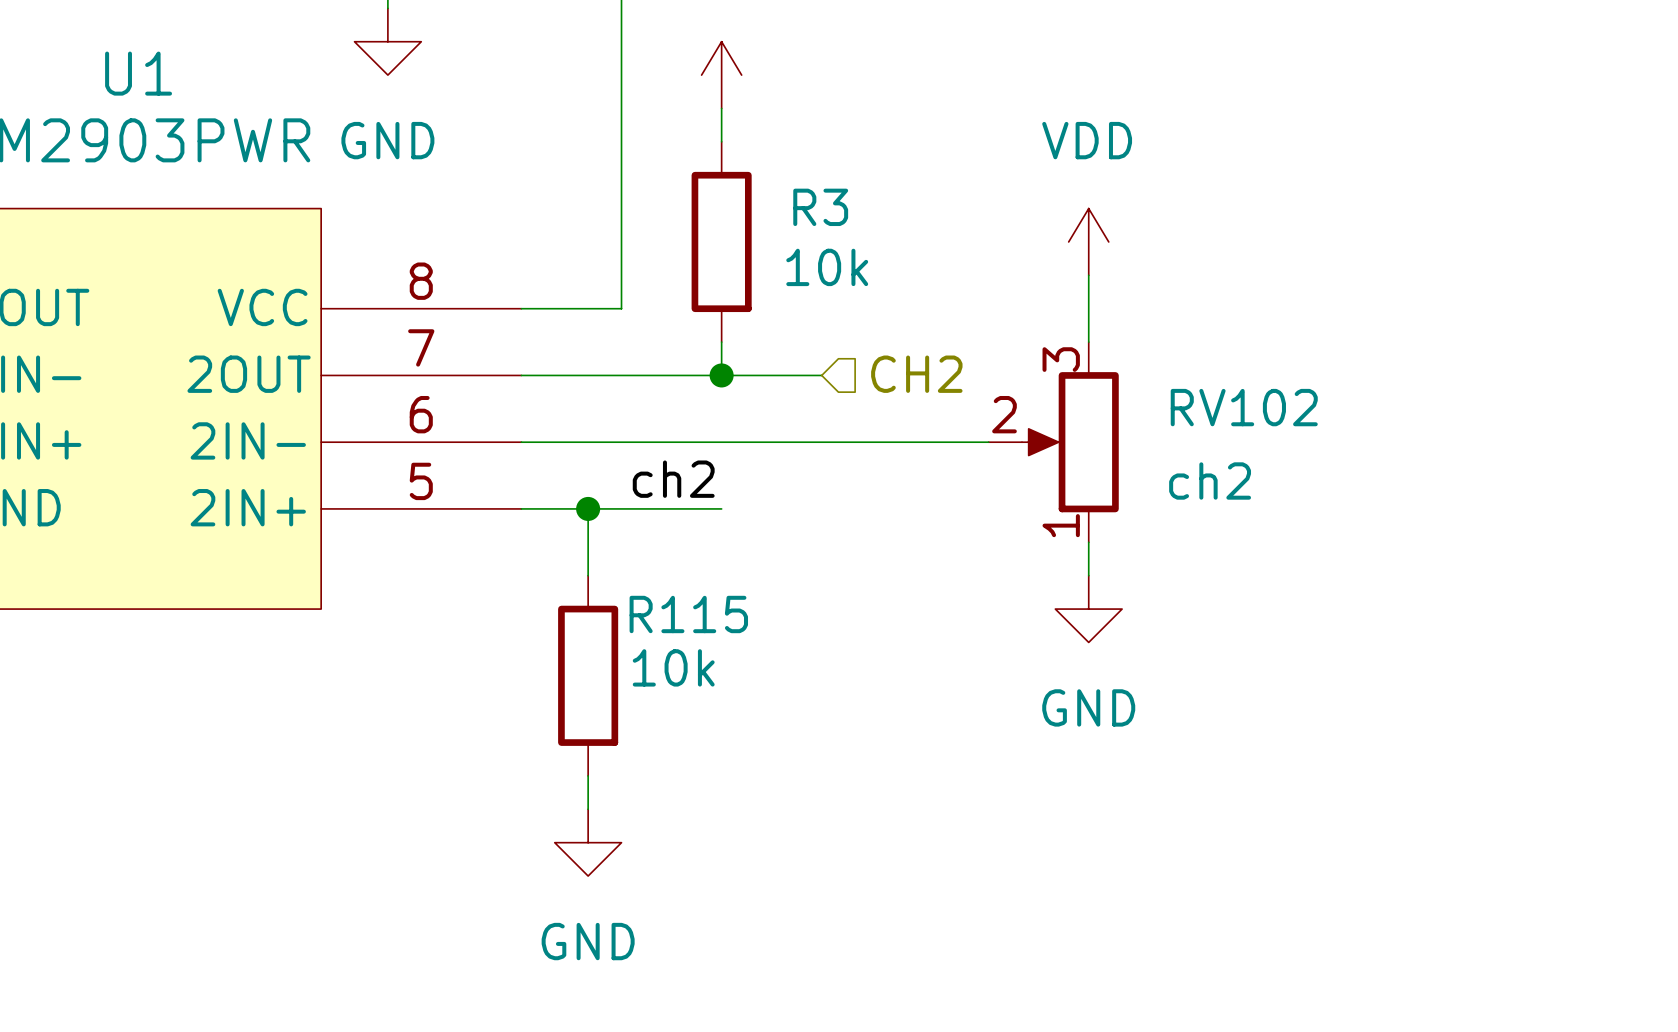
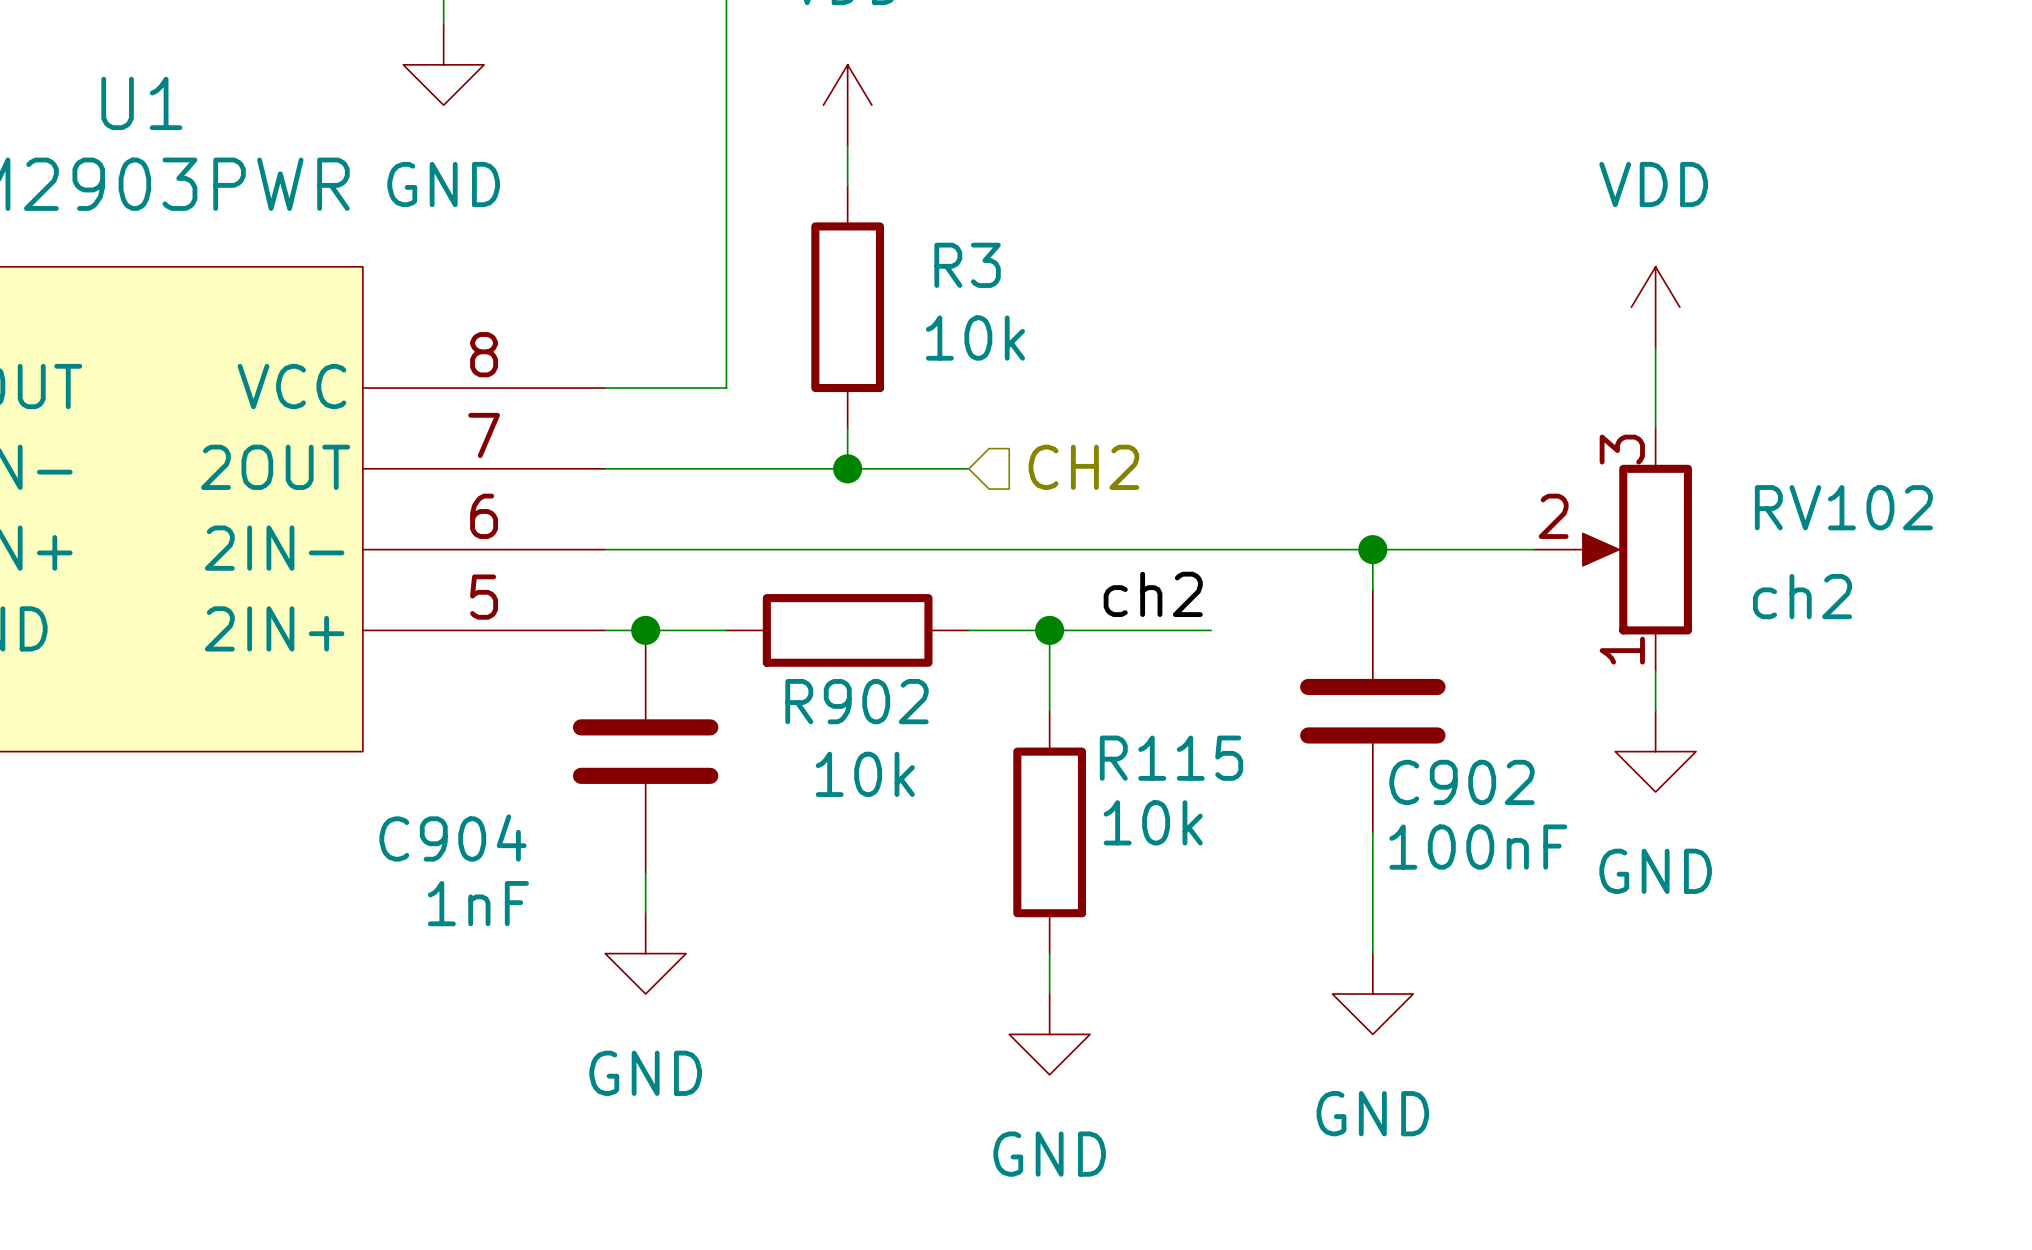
power symbol position: VDD (1088, 241) -> VDD (1655, 307)
wire: (1088, 275) (1088, 342) -> (1655, 347) (1655, 428)
wire: none -> (1170, 549) (1534, 549)
RV102 position: (1053, 442) -> (1613, 549)
wire: none -> (1372, 549) (1372, 590)
junction: none -> (1372, 549)
label position: ch2 (673, 479) -> ch2 (1153, 594)
wire: (588, 508) (588, 575) -> (1049, 630) (1049, 711)
junction position: (588, 508) -> (645, 630)
wire: (621, 508) (721, 508) -> none
R902: none -> 10k (847, 630)
wire: none -> (968, 630) (1211, 630)
junction: none -> (1049, 630)
wire: (1088, 542) (1088, 575) -> (1655, 670) (1655, 711)
C902: none -> 100nF (1372, 711)
C904: none -> 1nF (645, 751)
power symbol: GND (1088, 609) -> none
power symbol: none -> GND (1655, 751)
R115 position: (588, 675) -> (1049, 832)
wire: none -> (1372, 832) (1372, 953)
wire: none -> (645, 872) (645, 913)
wire: (588, 775) (588, 809) -> (1049, 953) (1049, 994)
power symbol: none -> GND (1372, 994)
power symbol position: GND (588, 842) -> GND (645, 953)
power symbol: none -> GND (1049, 1034)

